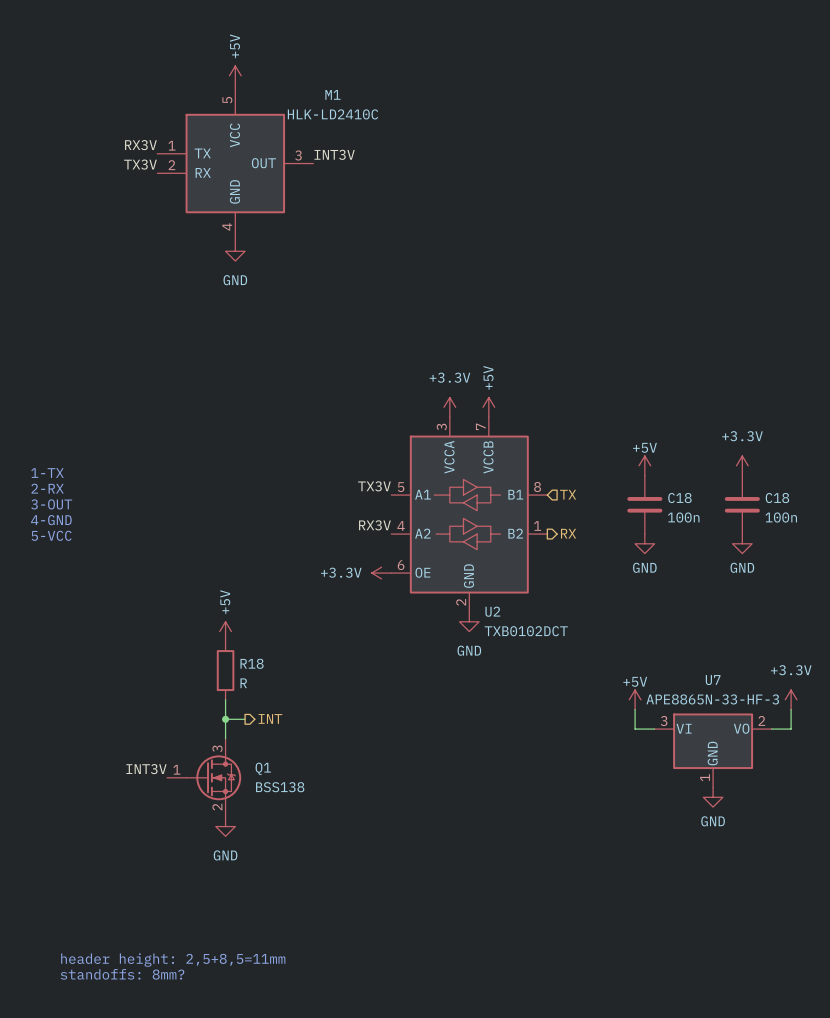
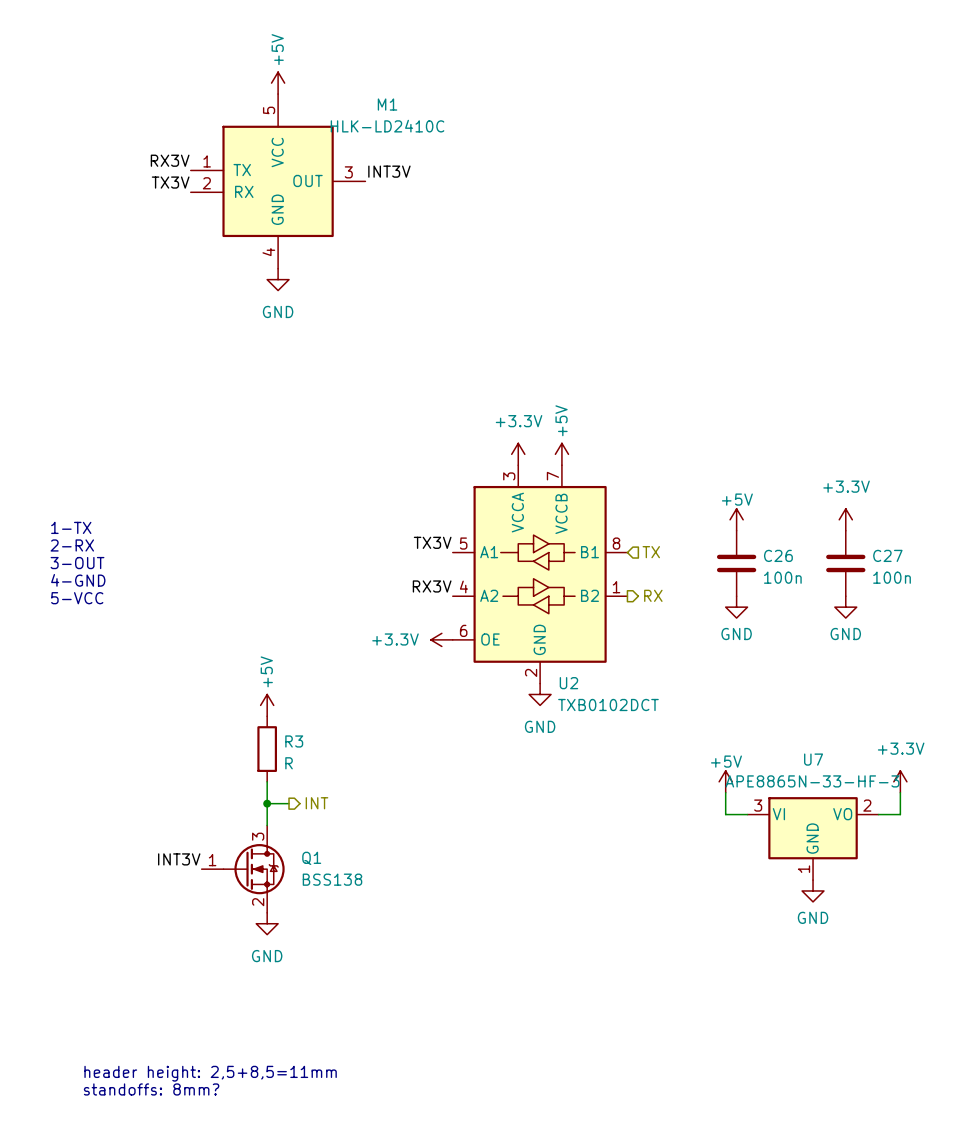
C18 name: C18 (679, 498) -> C26 (778, 555)
C18 name: C18 (777, 498) -> C27 (887, 555)
R18 name: R18 (252, 663) -> R3 (294, 741)

